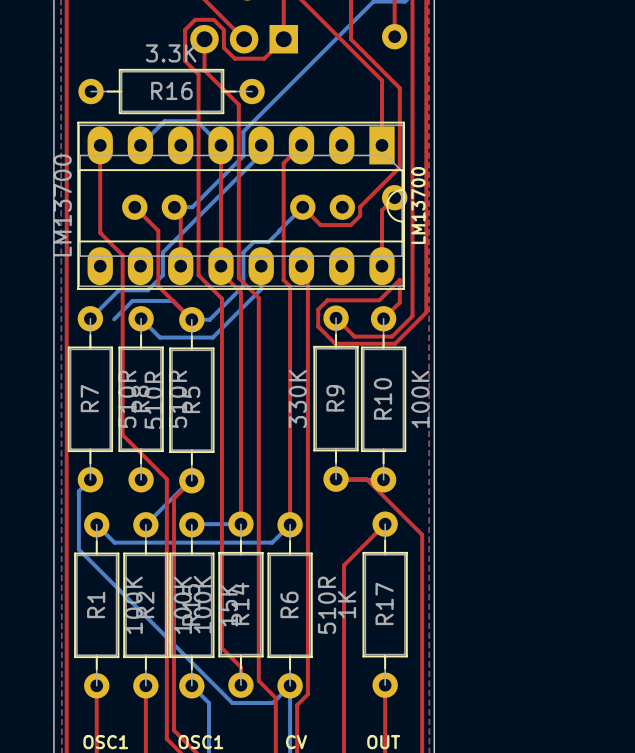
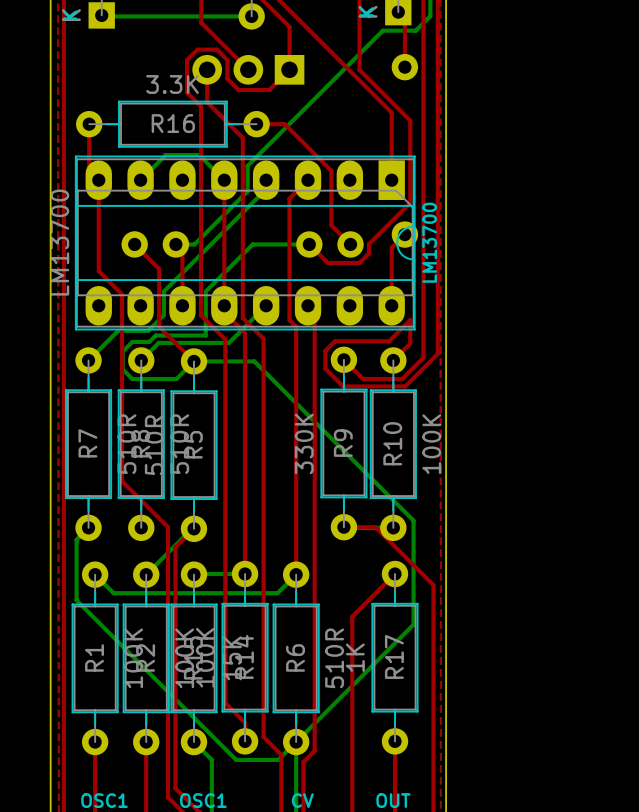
top track: none -> (89, 124) (89, 170) (98, 180)
top track: none -> (256, 124) (284, 124) (331, 170) (331, 225) (350, 244)
bottom track: (302, 207) (268, 242) (253, 242) (243, 252) (243, 286) (209, 319) -> (309, 244) (252, 244) (205, 291) (205, 335) (155, 335) (149, 341)
bottom track: (261, 266) (261, 289) (212, 337) (159, 337) (141, 318) -> (266, 305) (229, 342) (158, 342) (141, 360)
bottom track: (148, 300) (173, 300) (191, 319) -> (122, 351) (122, 369) (132, 378) (176, 378) (193, 361)
bottom track: (123, 310) (114, 319) -> none
bottom track: none -> (212, 361) (254, 361) (413, 520) (413, 624) (296, 742)

